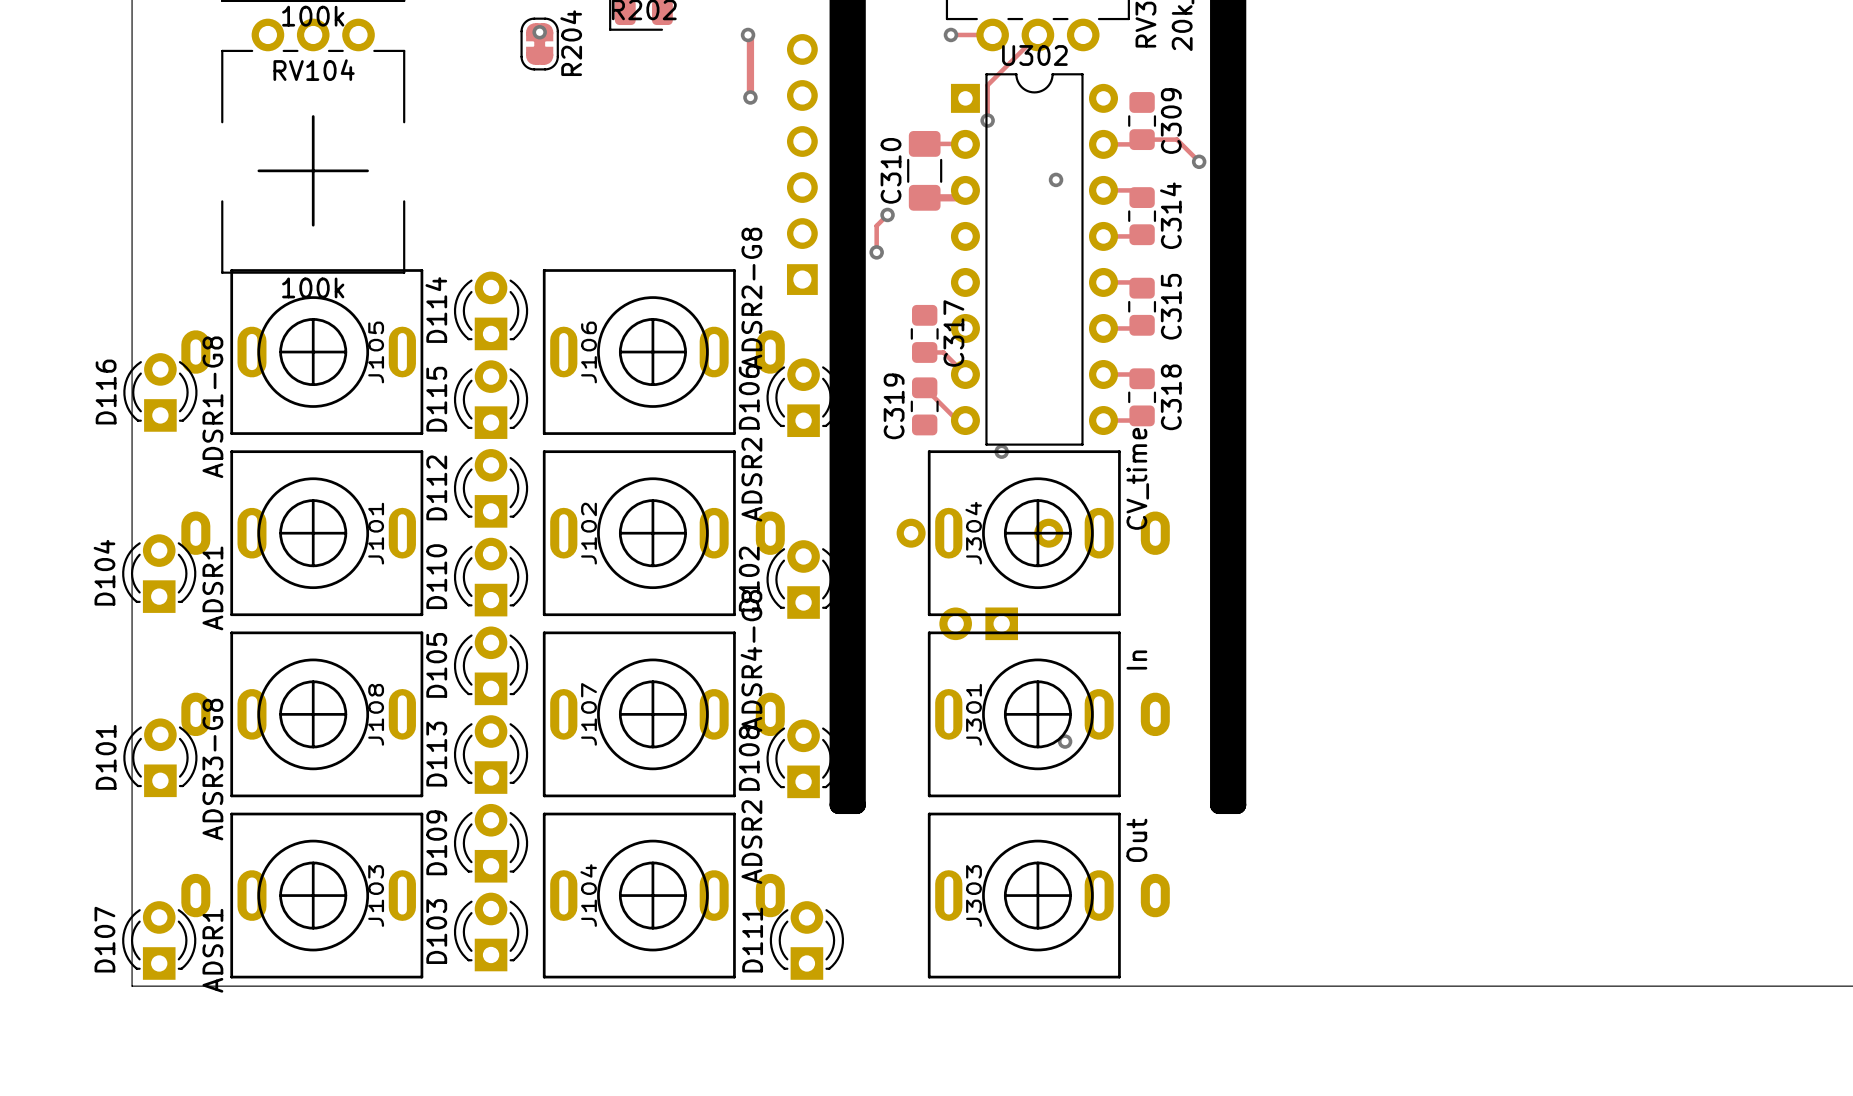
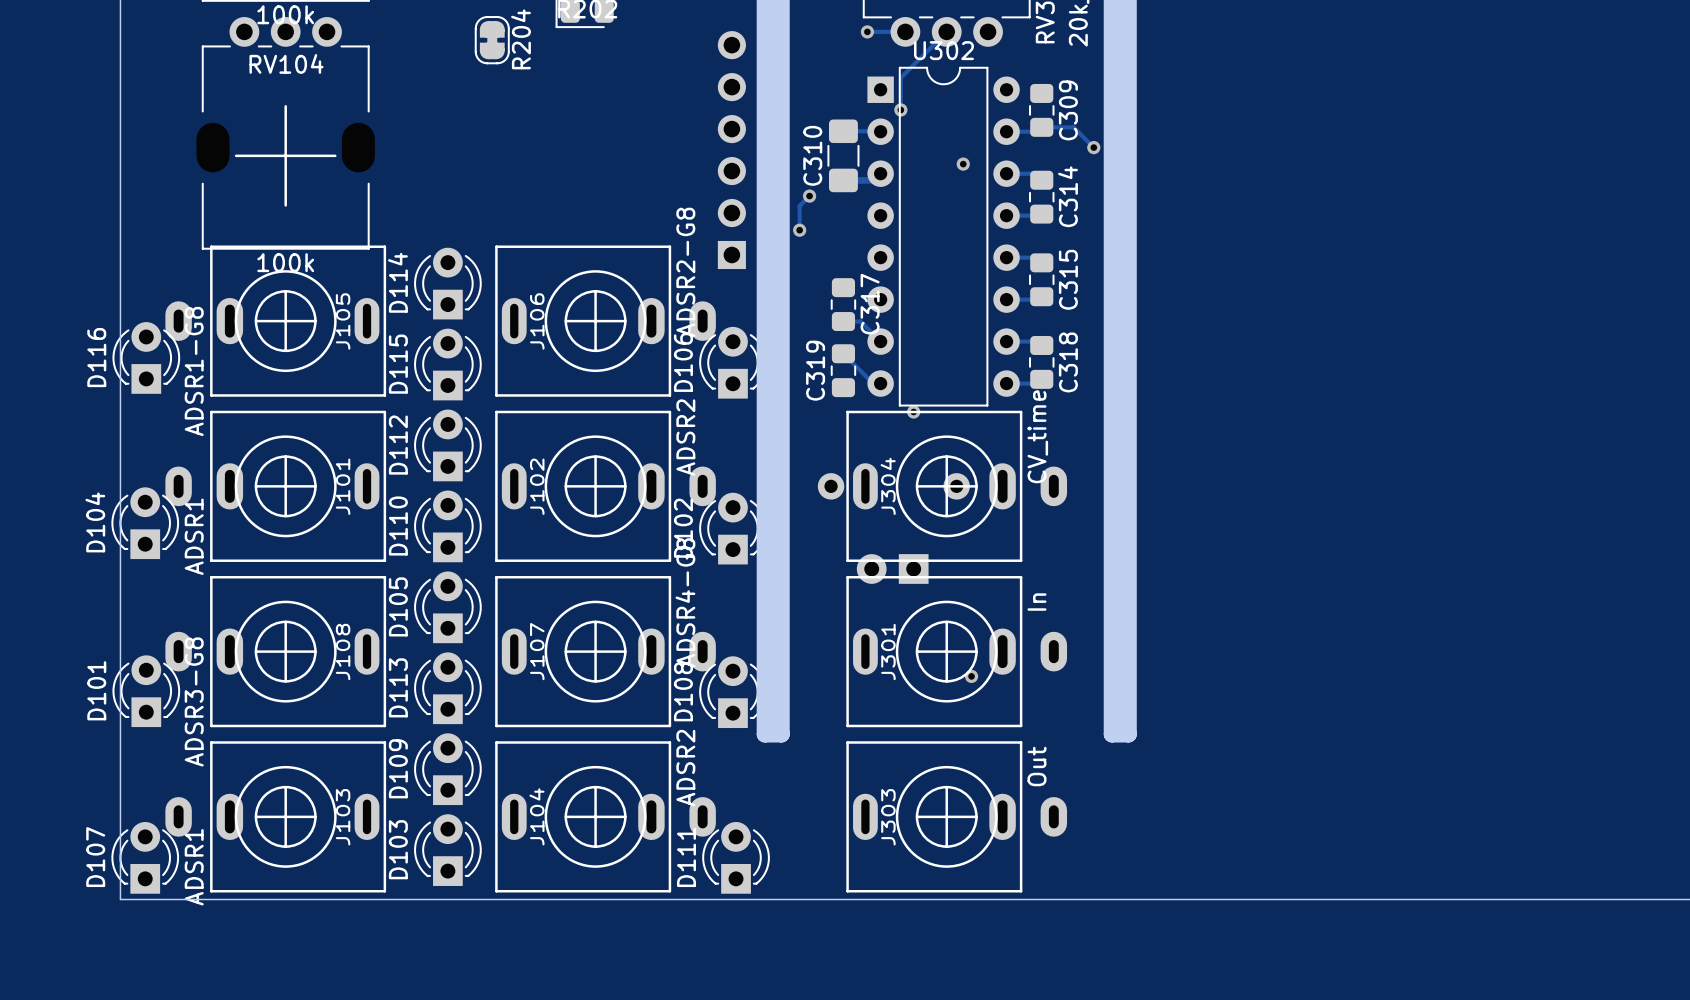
via: (539, 32) -> none
track: (748, 34) (750, 37) (750, 97) -> none
via: (748, 34) -> none
via: (750, 97) -> none

